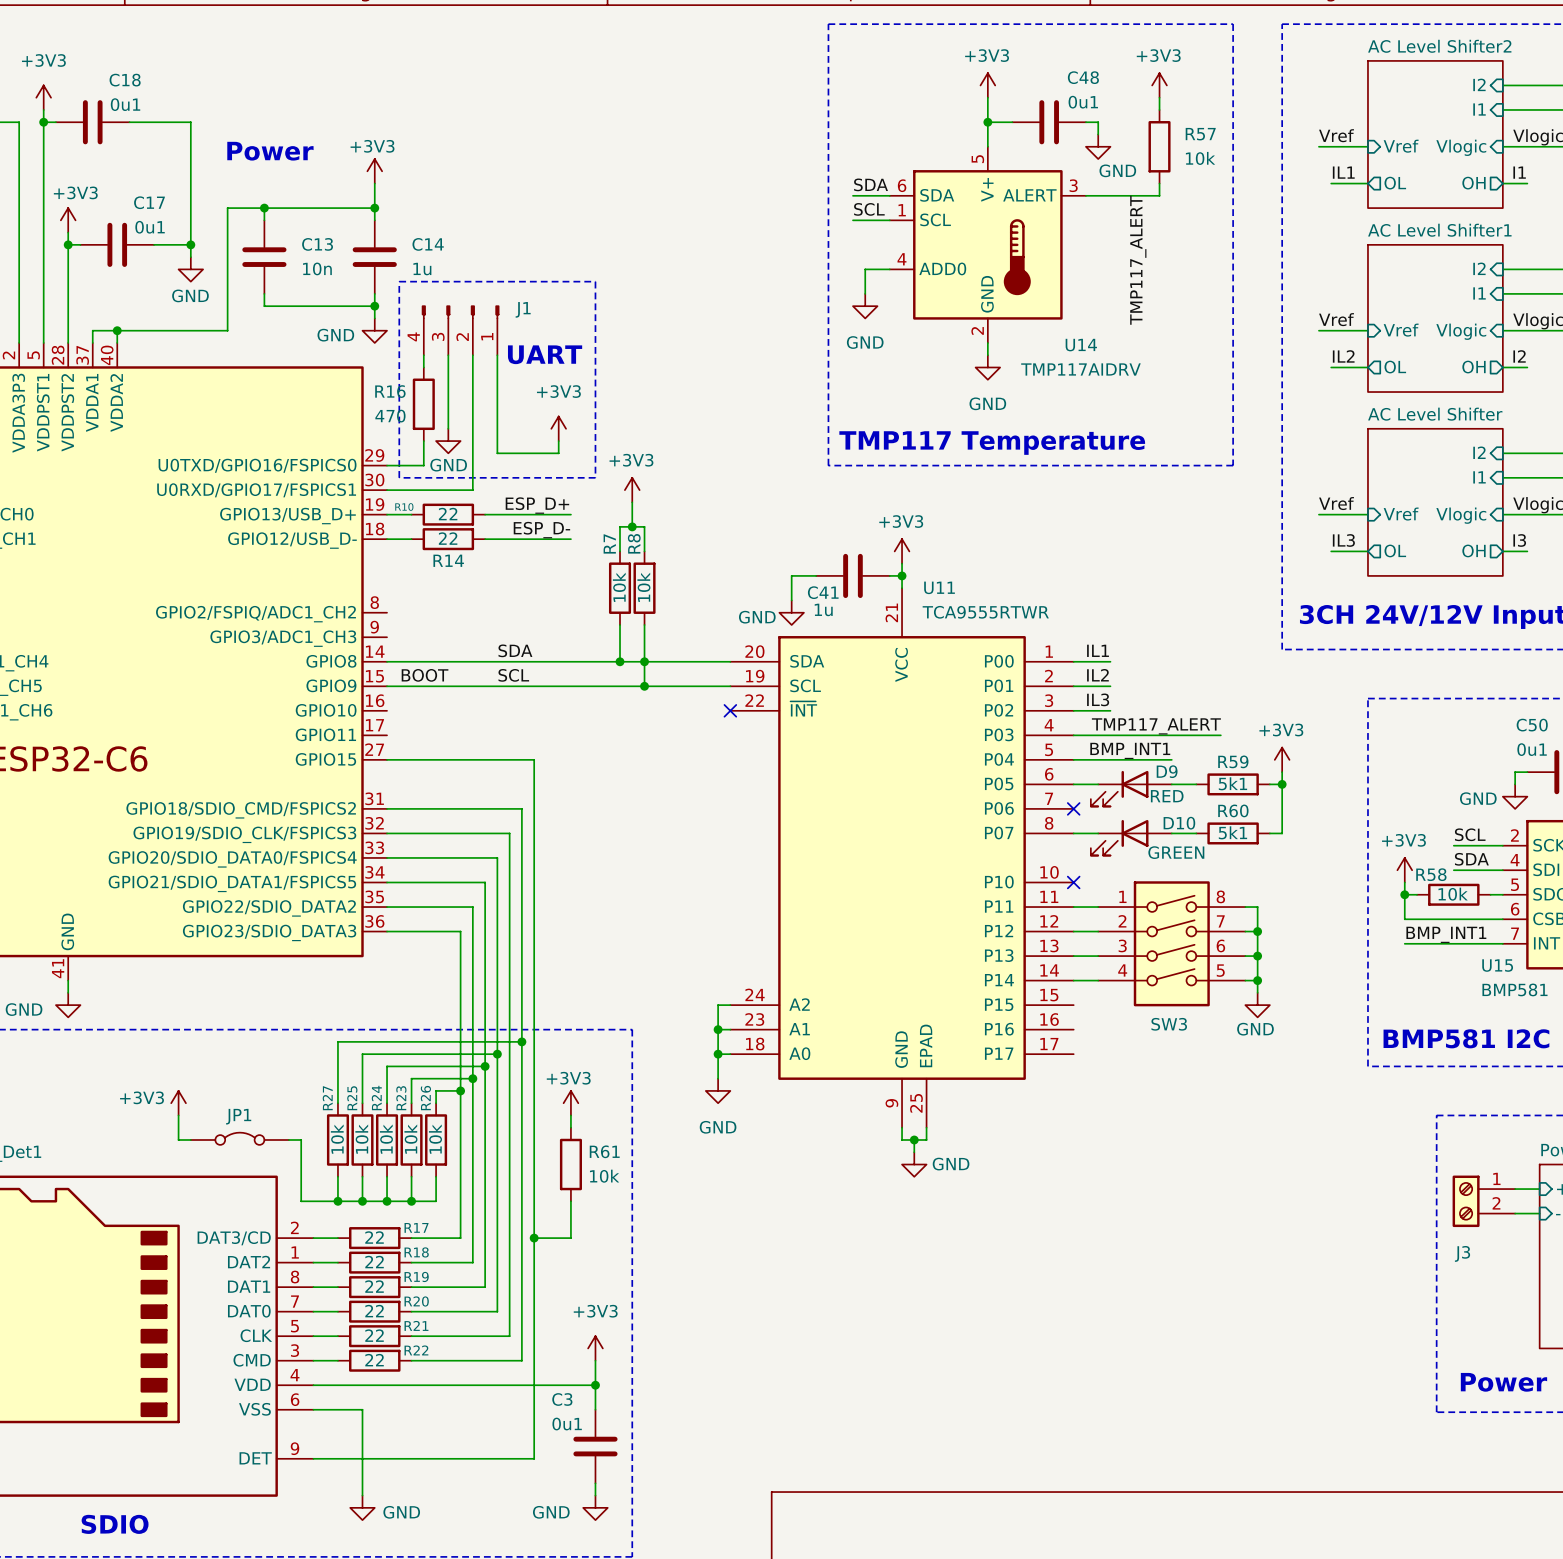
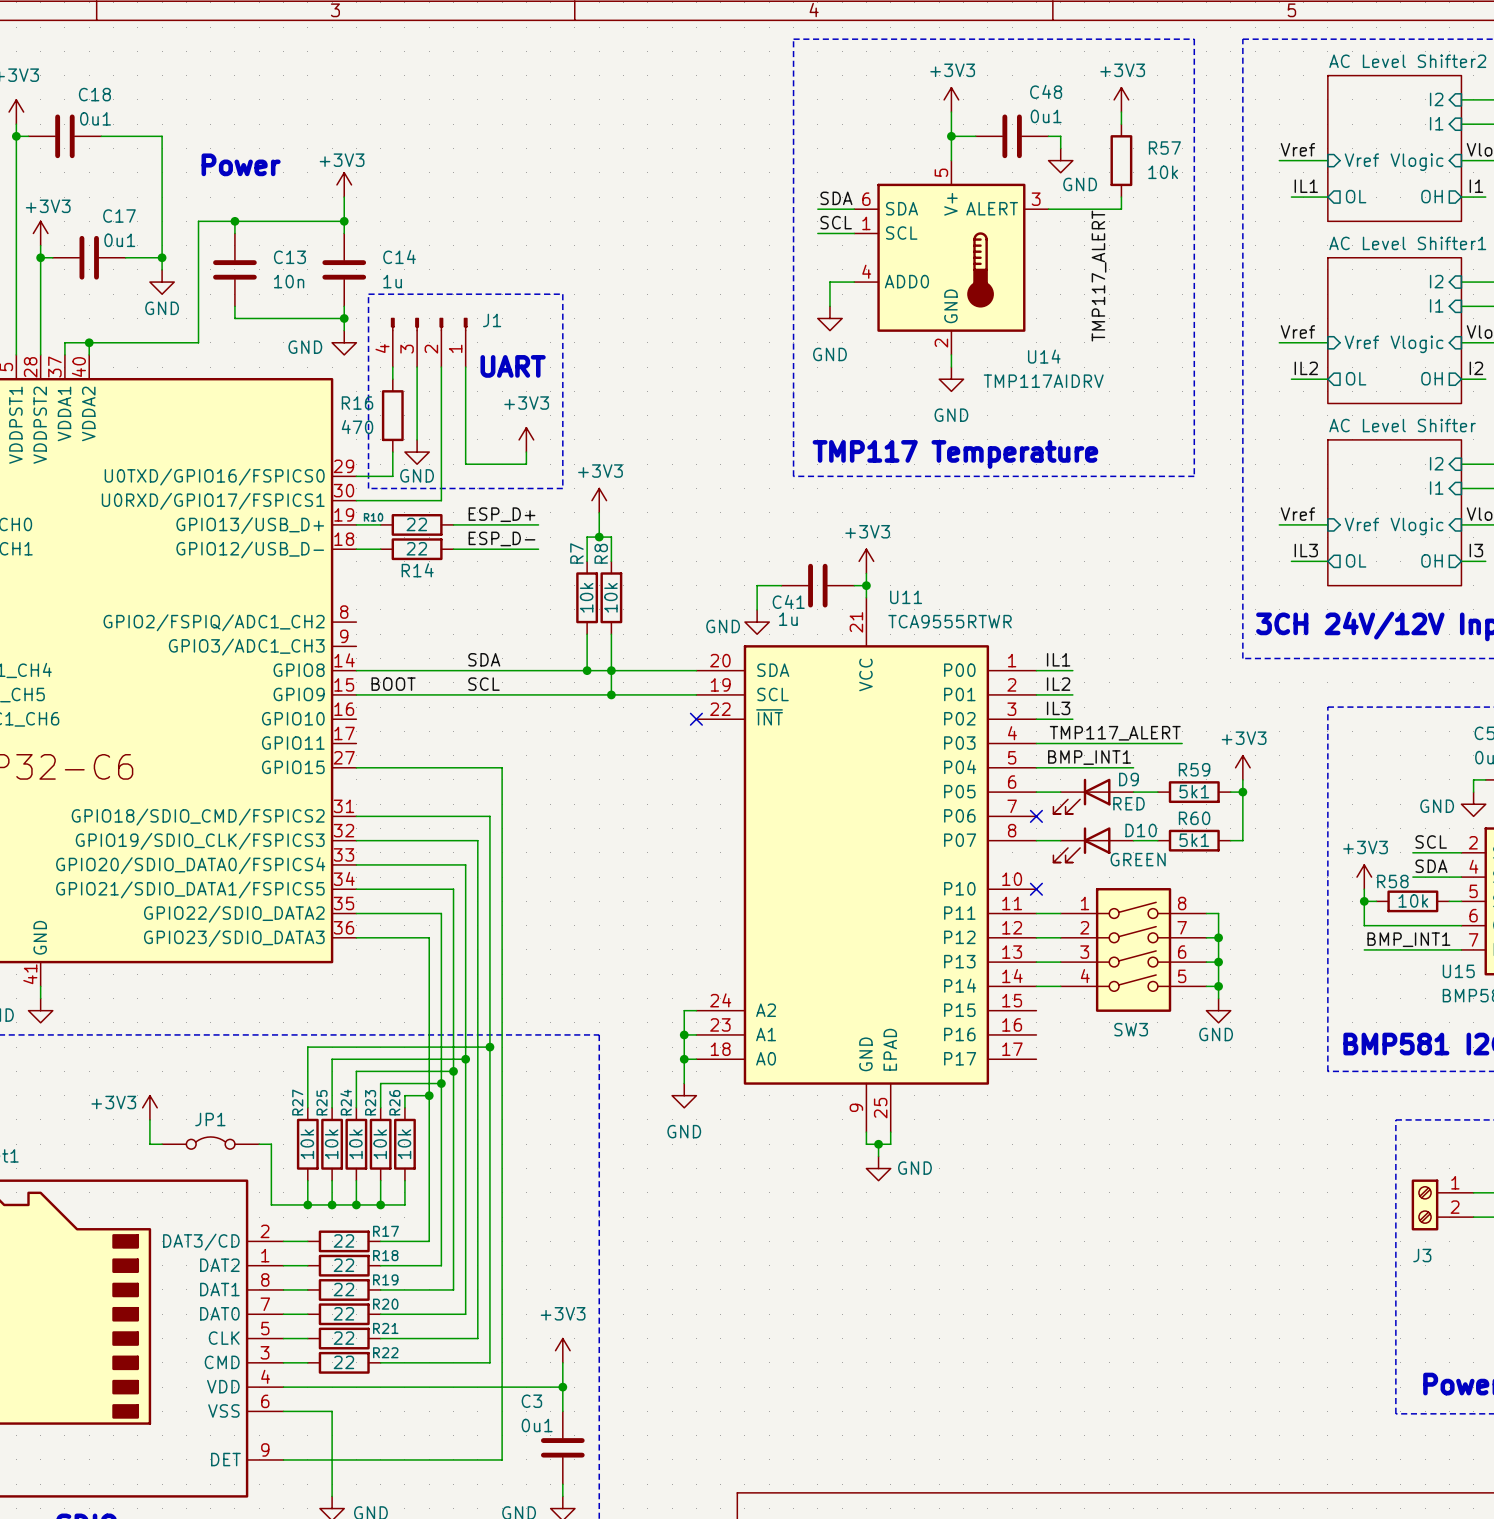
power symbol: +3V3 (570, 1103) -> none
wire: (570, 1115) (570, 1127) -> none
R61: 10k (570, 1164) -> none
wire: (570, 1201) (570, 1238) (534, 1238) -> none
junction: (534, 1238) -> none

